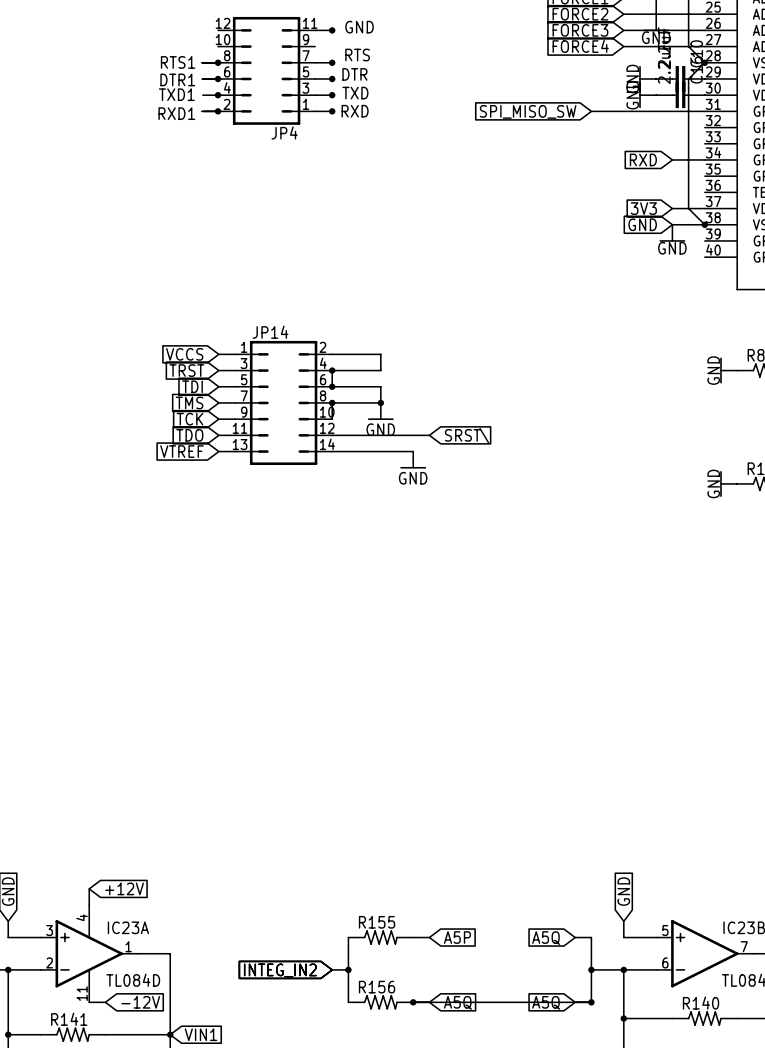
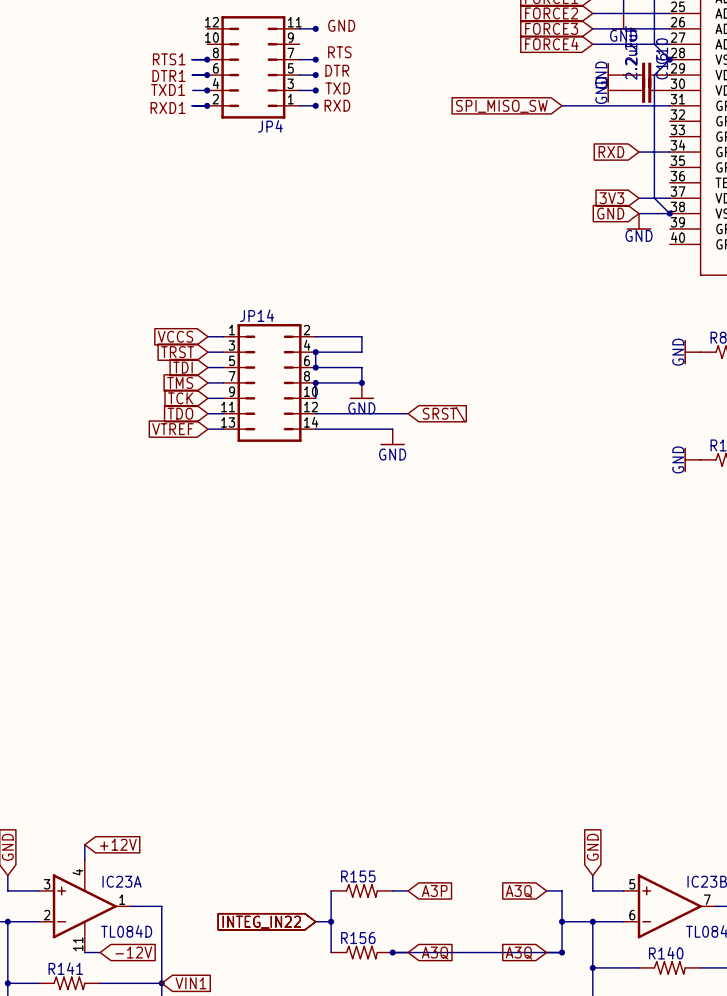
global label: A5P (457, 937) -> A3P (434, 890)
global label: A5Q (546, 938) -> A3Q (519, 891)
global label: INTEG_IN2 (280, 970) -> INTEG_IN22 (261, 922)
global label: A5Q (457, 1002) -> A3Q (435, 953)
global label: A5Q (546, 1002) -> A3Q (519, 953)

